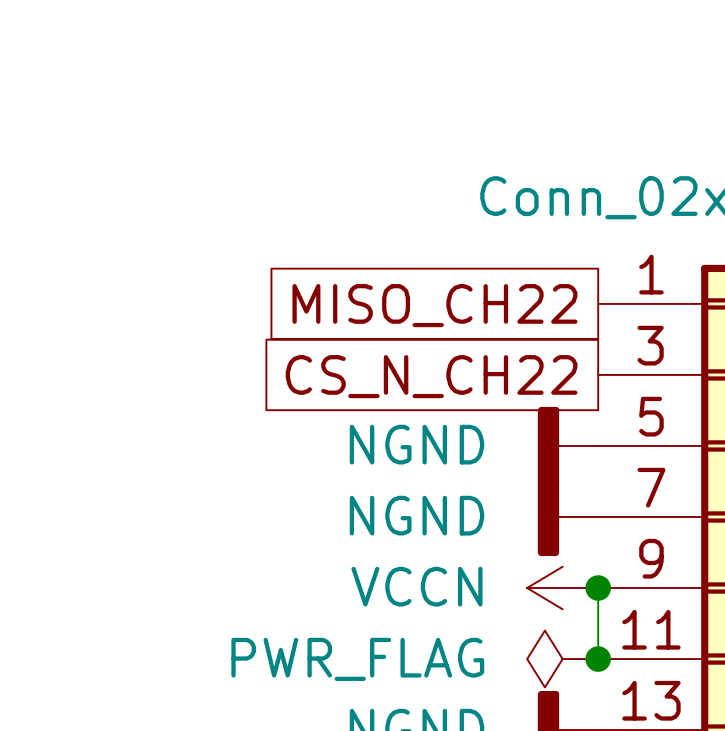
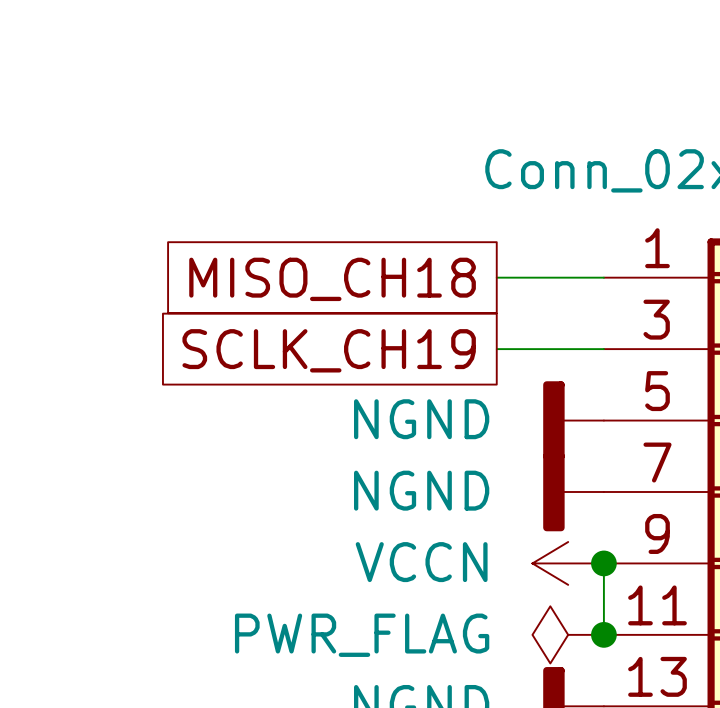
wire: none -> (496, 277) (603, 277)
global label: MISO_CH22 (434, 305) -> MISO_CH18 (332, 279)
wire: none -> (496, 349) (603, 349)
global label: none -> SCLK_CH19 (329, 350)
global label: CS_N_CH22 (431, 376) -> none

